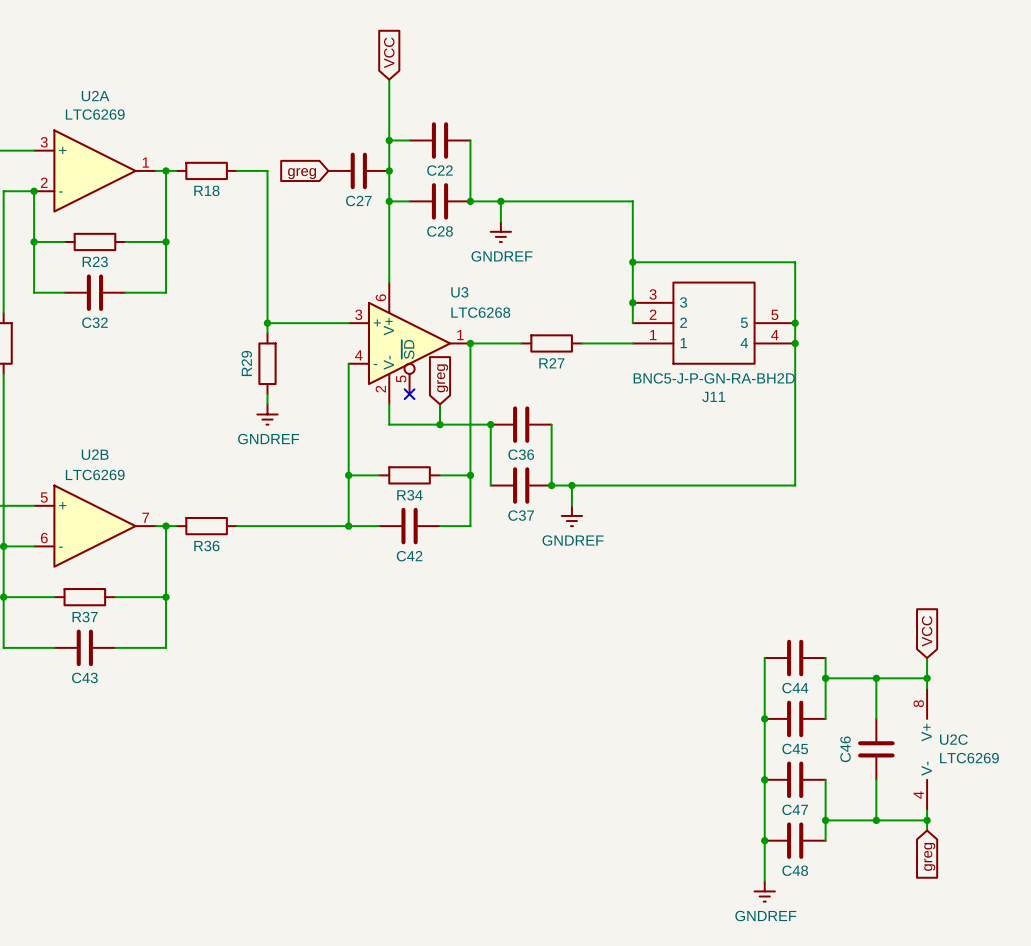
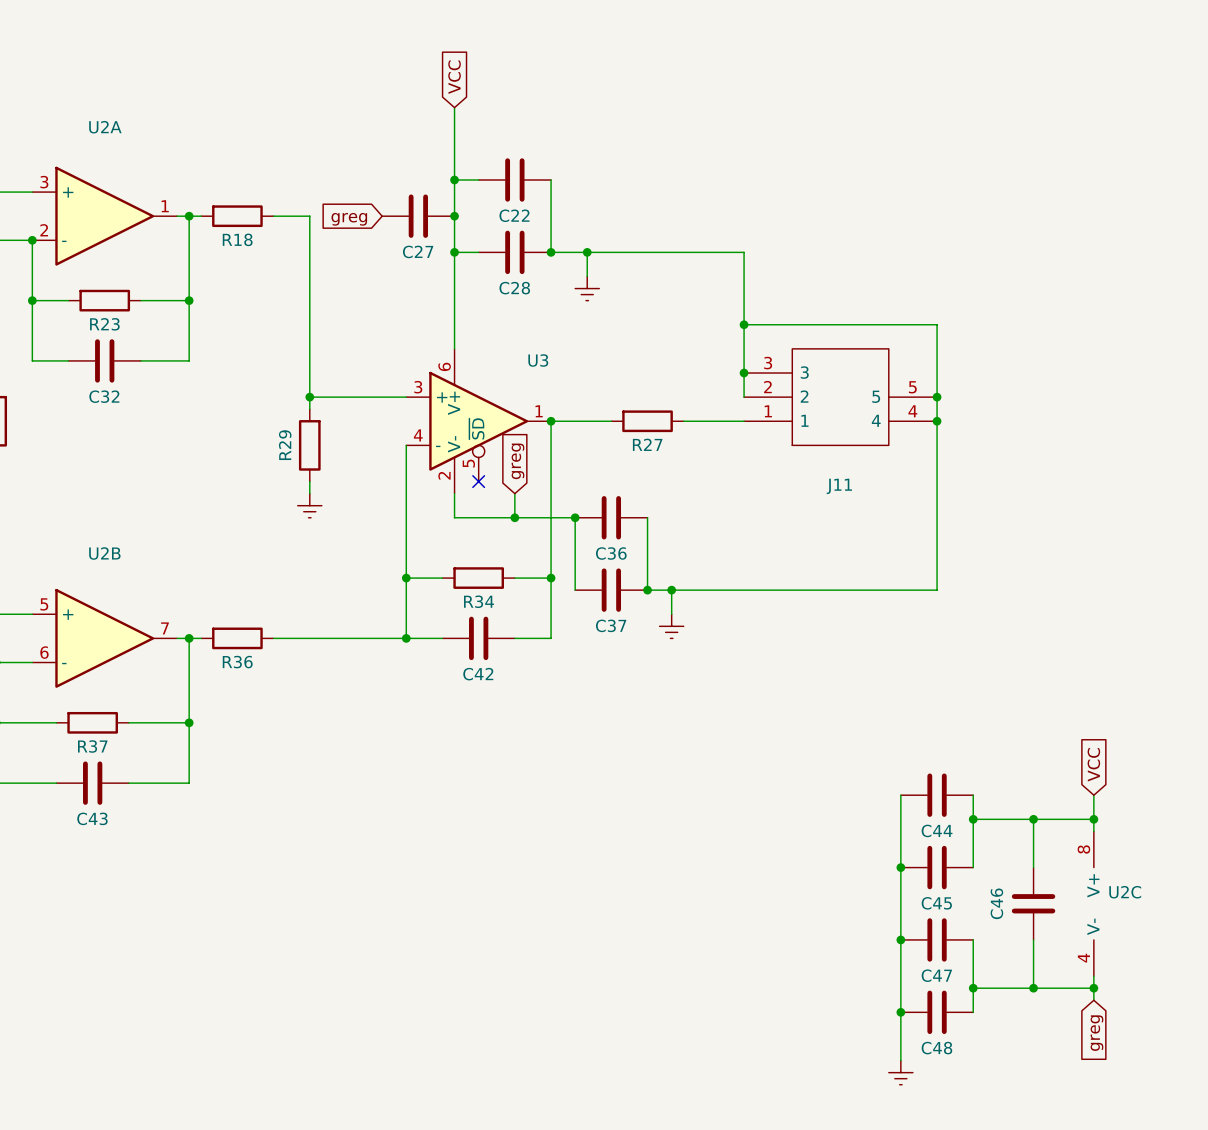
U2A value: LTC6269 (95, 114) -> none
power symbol text: GNDREF (501, 256) -> none
U3 value: LTC6268 (480, 312) -> none
J11 value: BNC5-J-P-GN-RA-BH2D (714, 378) -> none
power symbol text: GNDREF (268, 439) -> none
U2B value: LTC6269 (95, 474) -> none
power symbol text: GNDREF (573, 540) -> none
U2C value: LTC6269 (969, 758) -> none
power symbol text: GNDREF (765, 916) -> none

